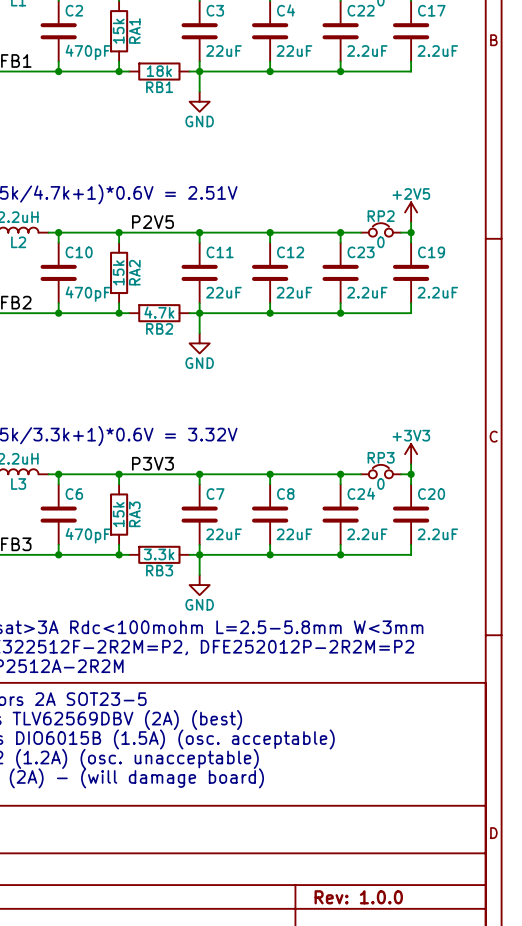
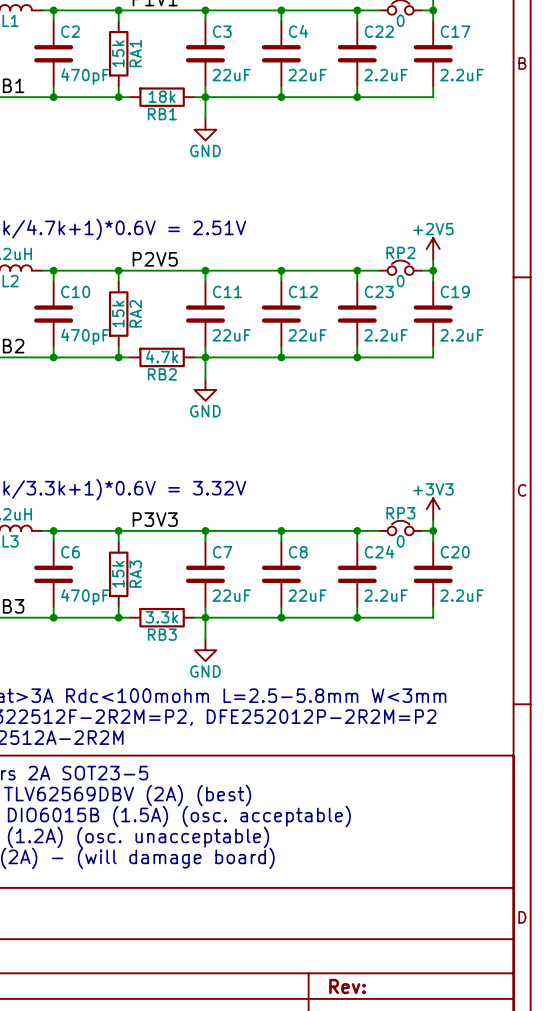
title block: Rev: 1.0.0 (358, 897) -> Rev: (347, 986)

